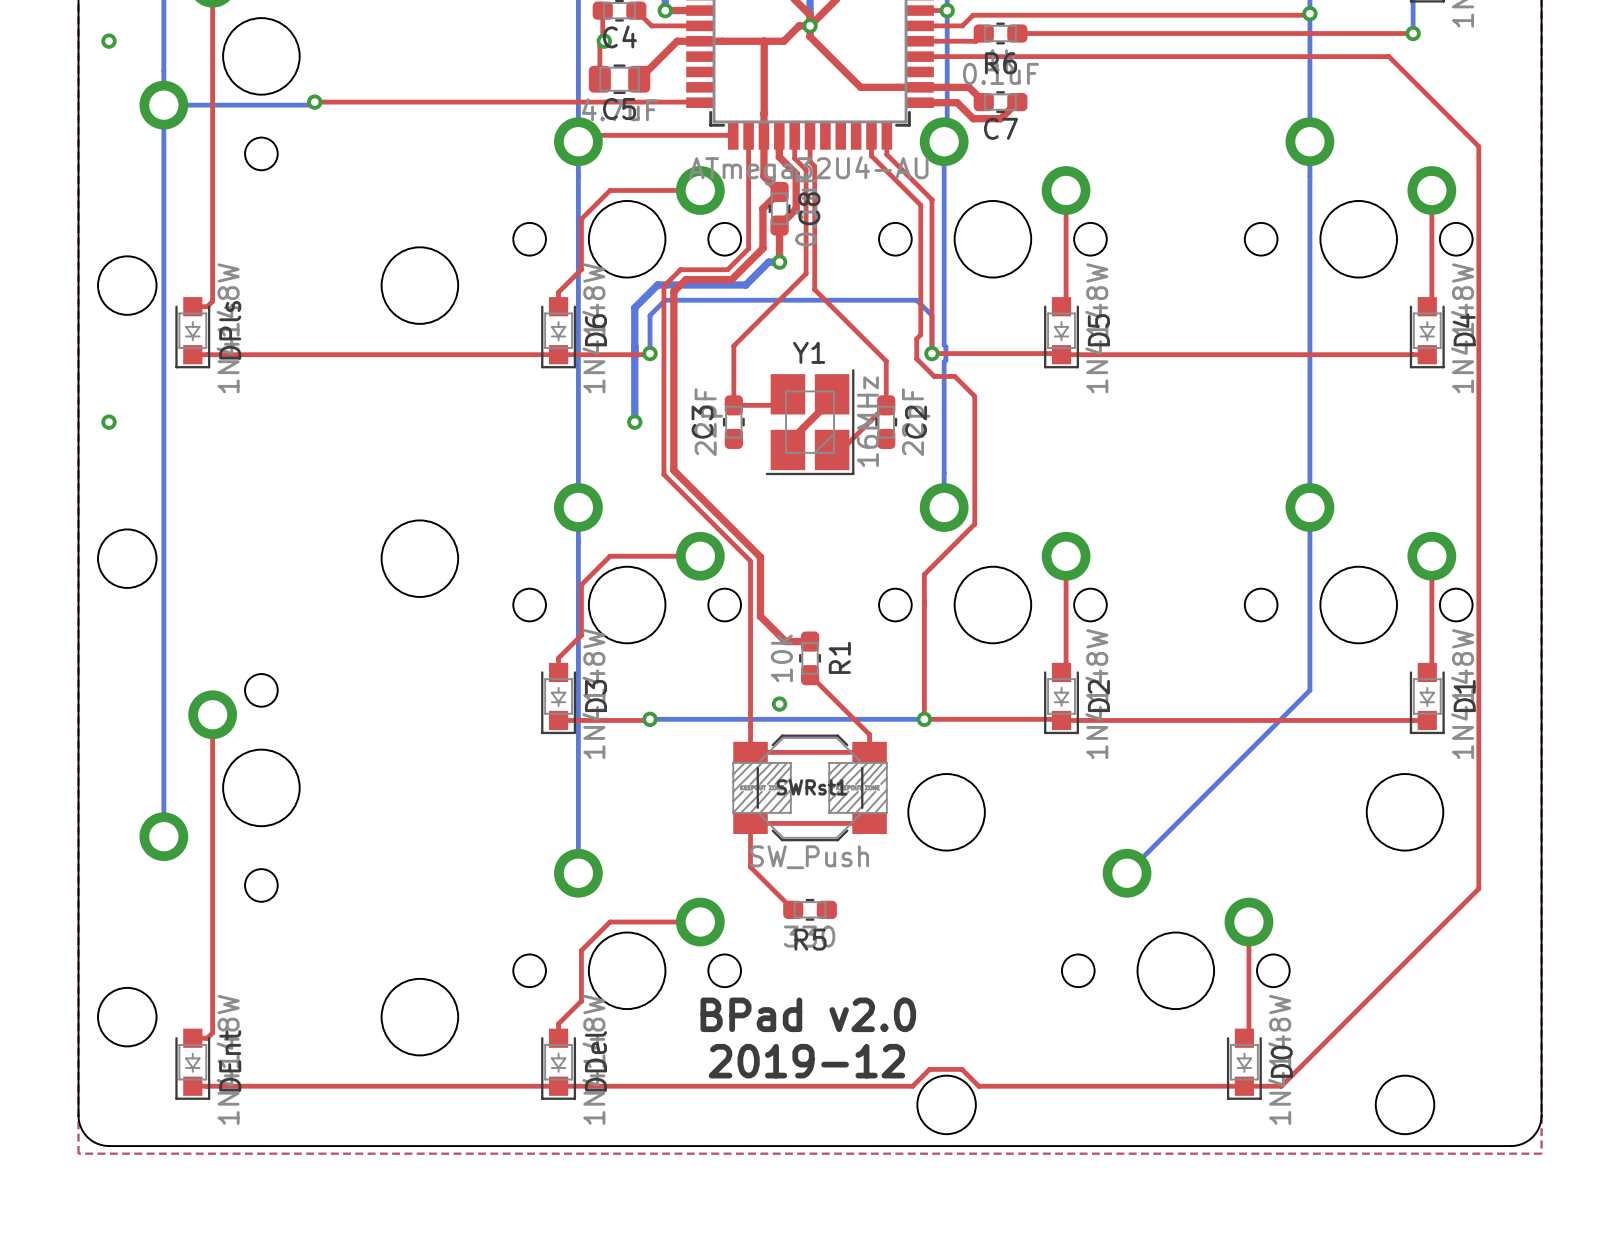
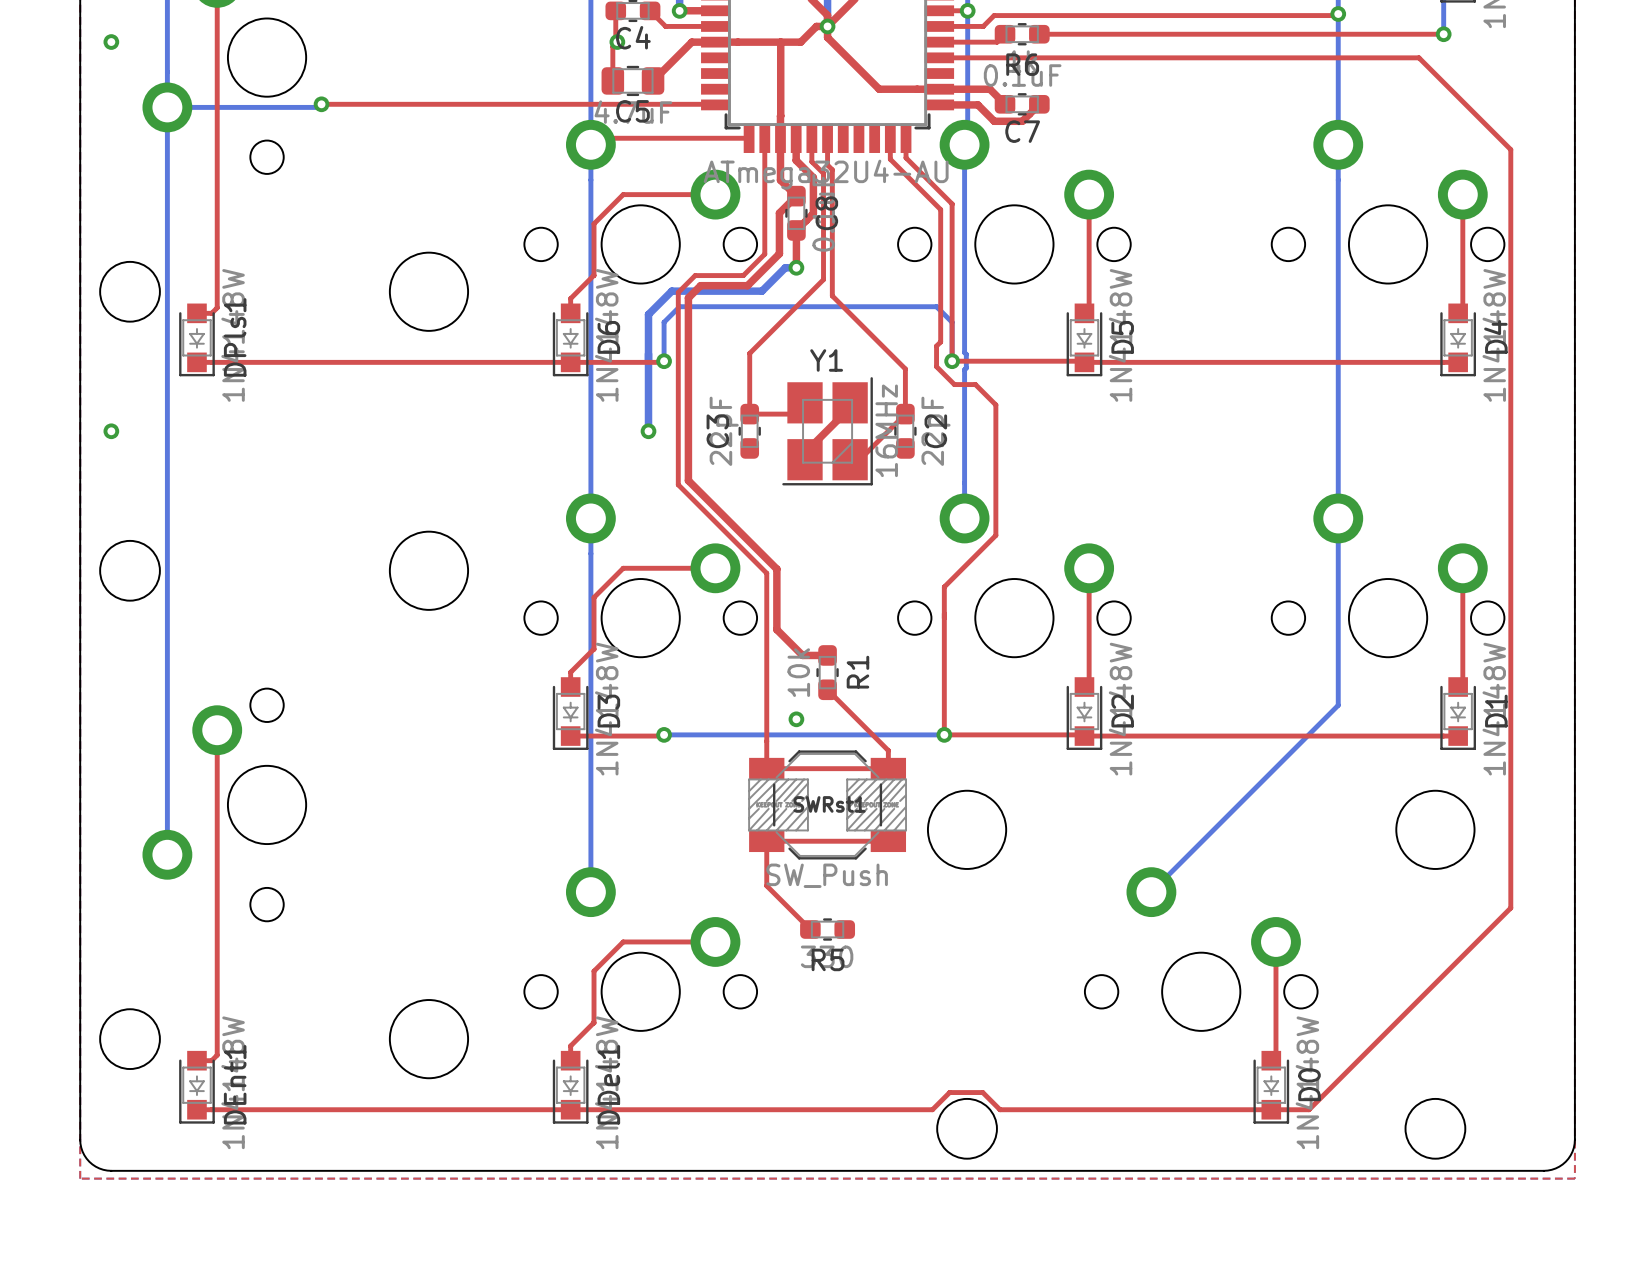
DPls name: DPls (230, 330) -> DPls1 (235, 337)
text: BPad v2.0 (808, 1014) -> none
DEnt name: DEnt (230, 1060) -> DEnt1 (235, 1084)
DDel name: DDel (595, 1061) -> DDel1 (608, 1084)
text: 2019-12 (806, 1061) -> none

